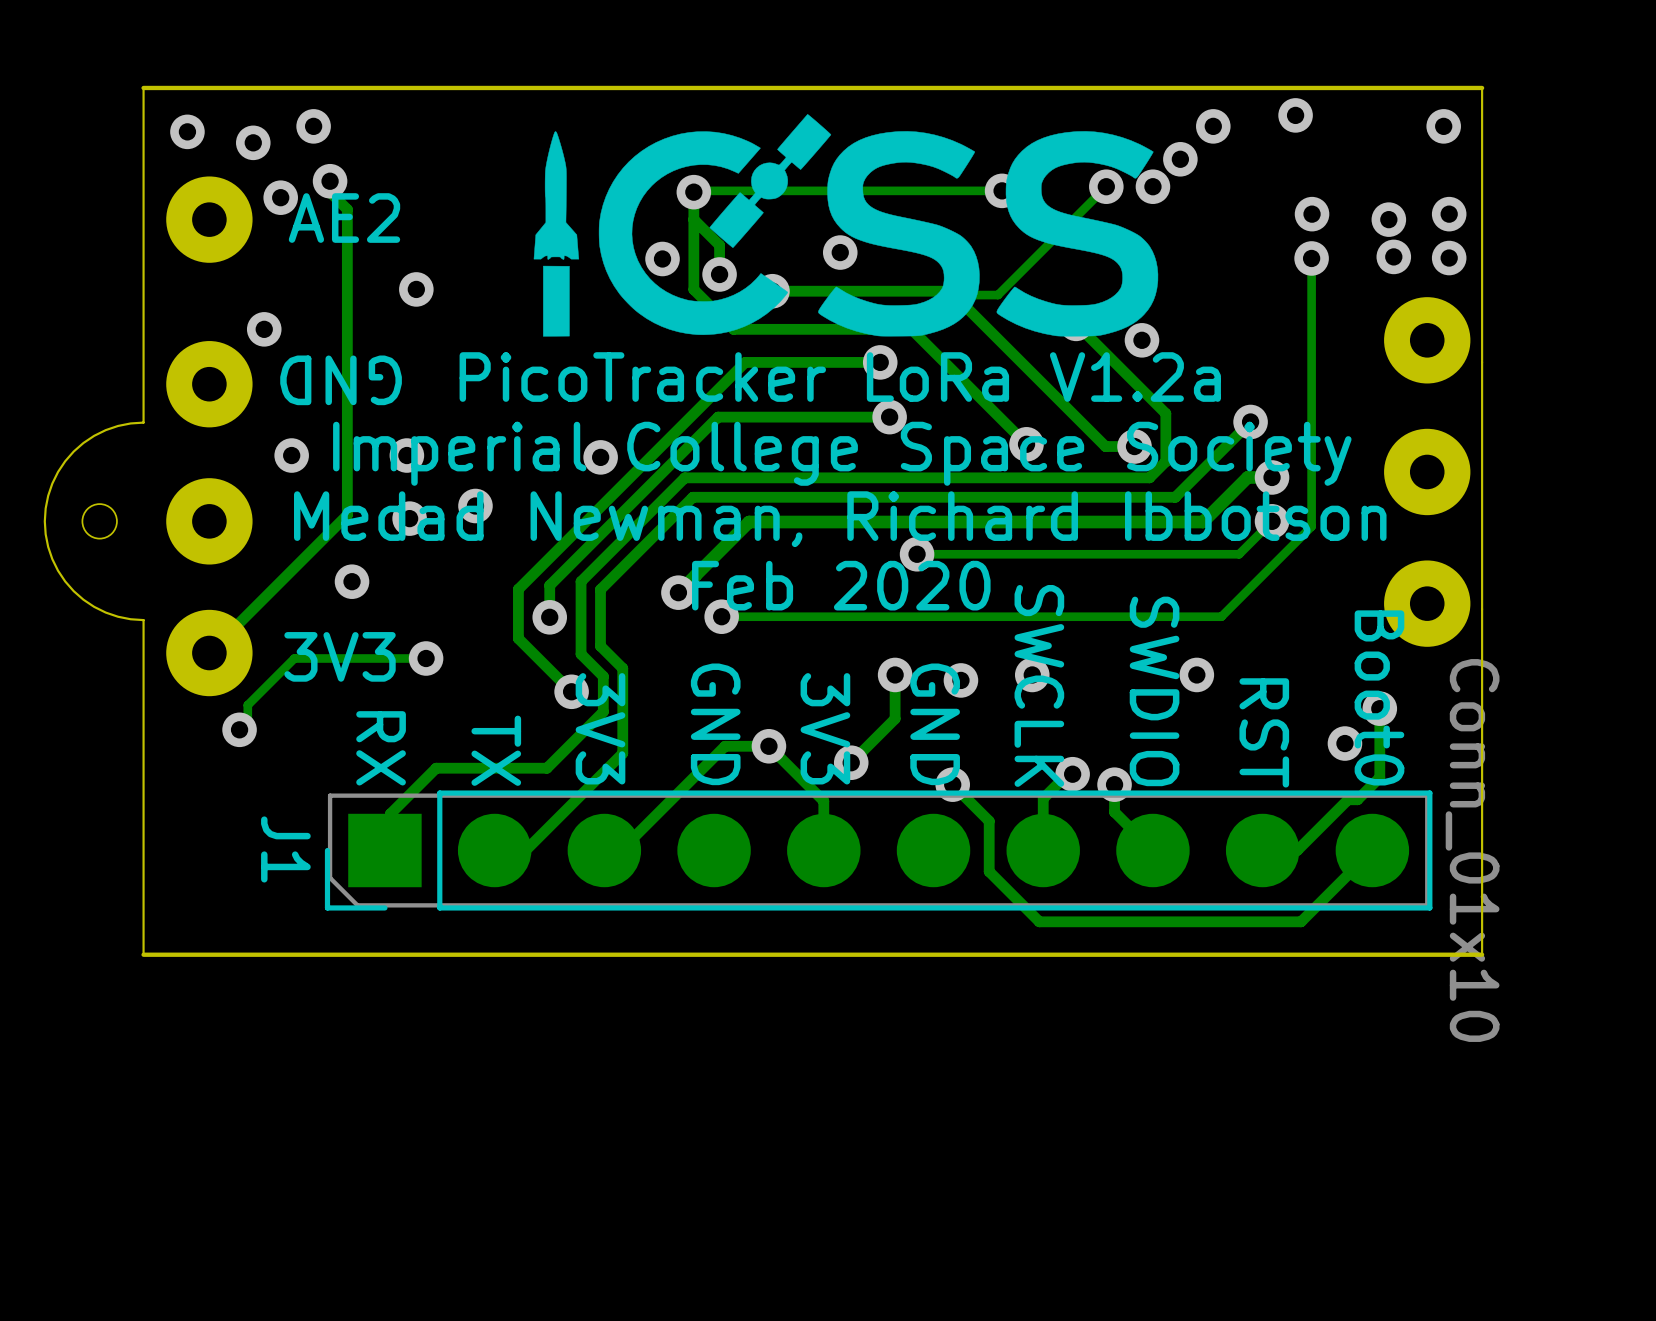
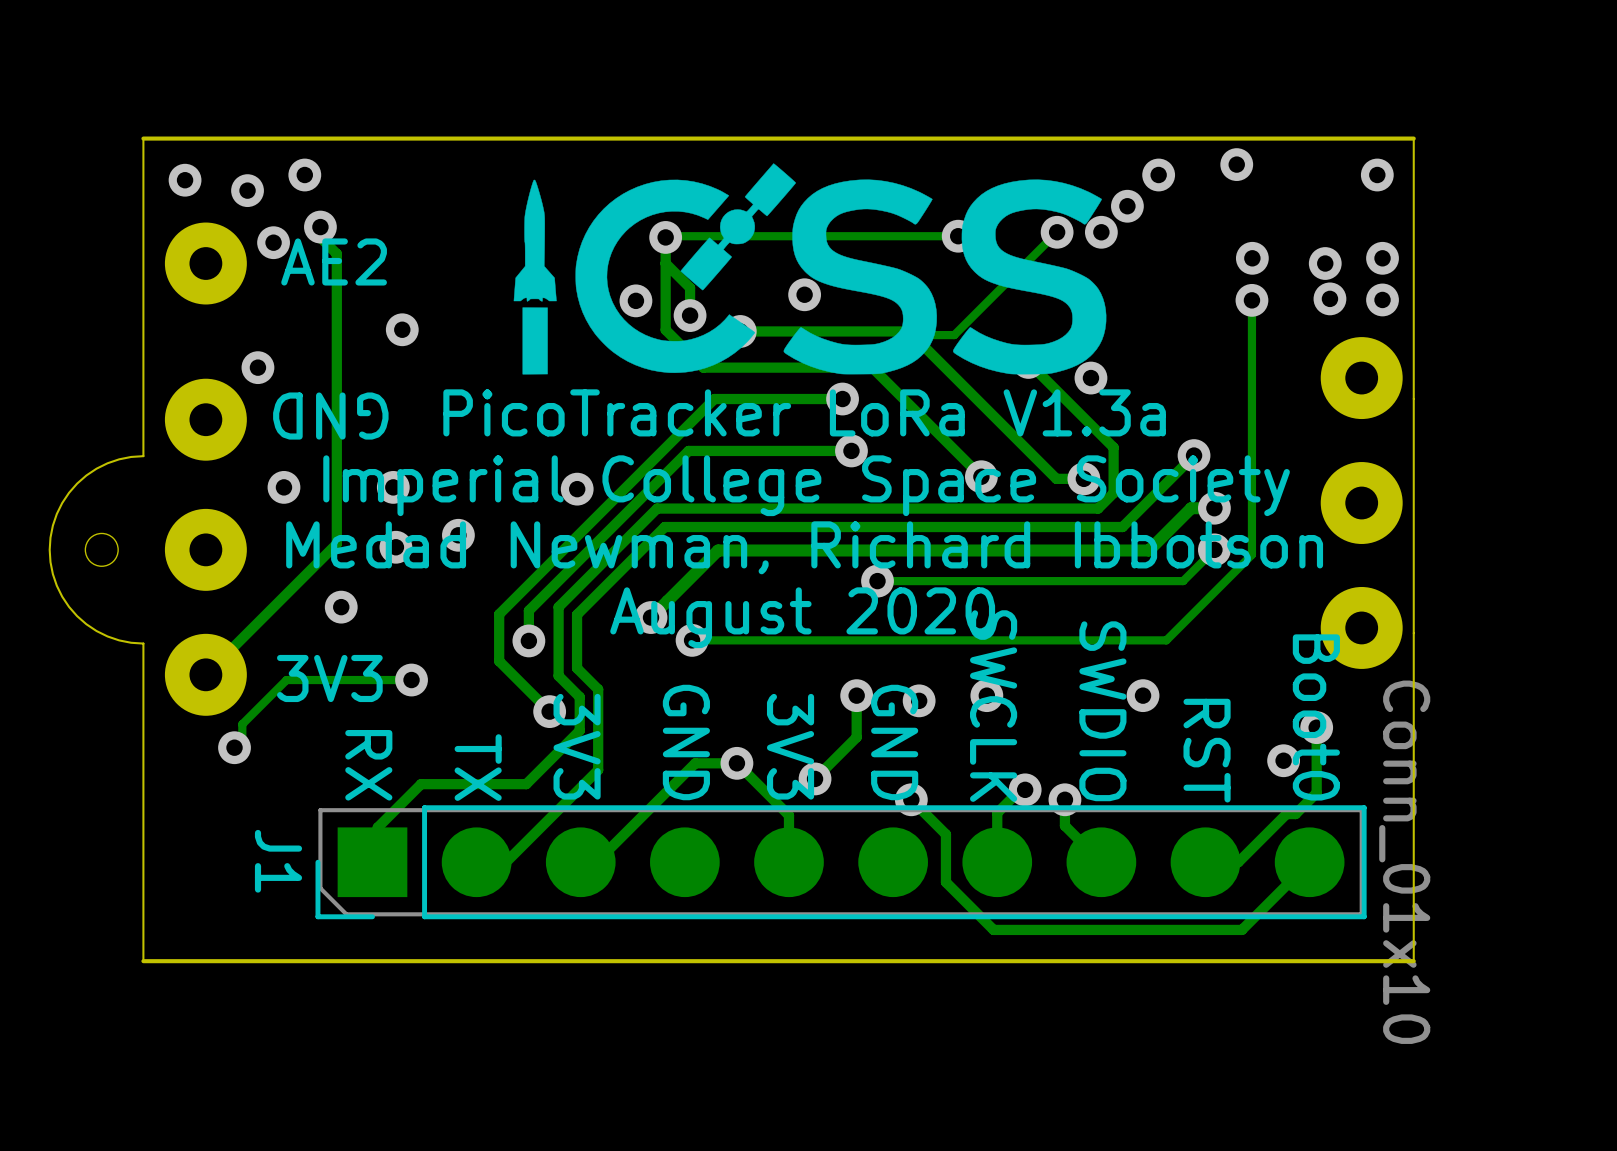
text: PicoTracker LoRa V1.2a (840, 377) -> PicoTracker LoRa V1.3a (804, 412)
text: Feb 2020 (841, 585) -> August 2020 (802, 617)

